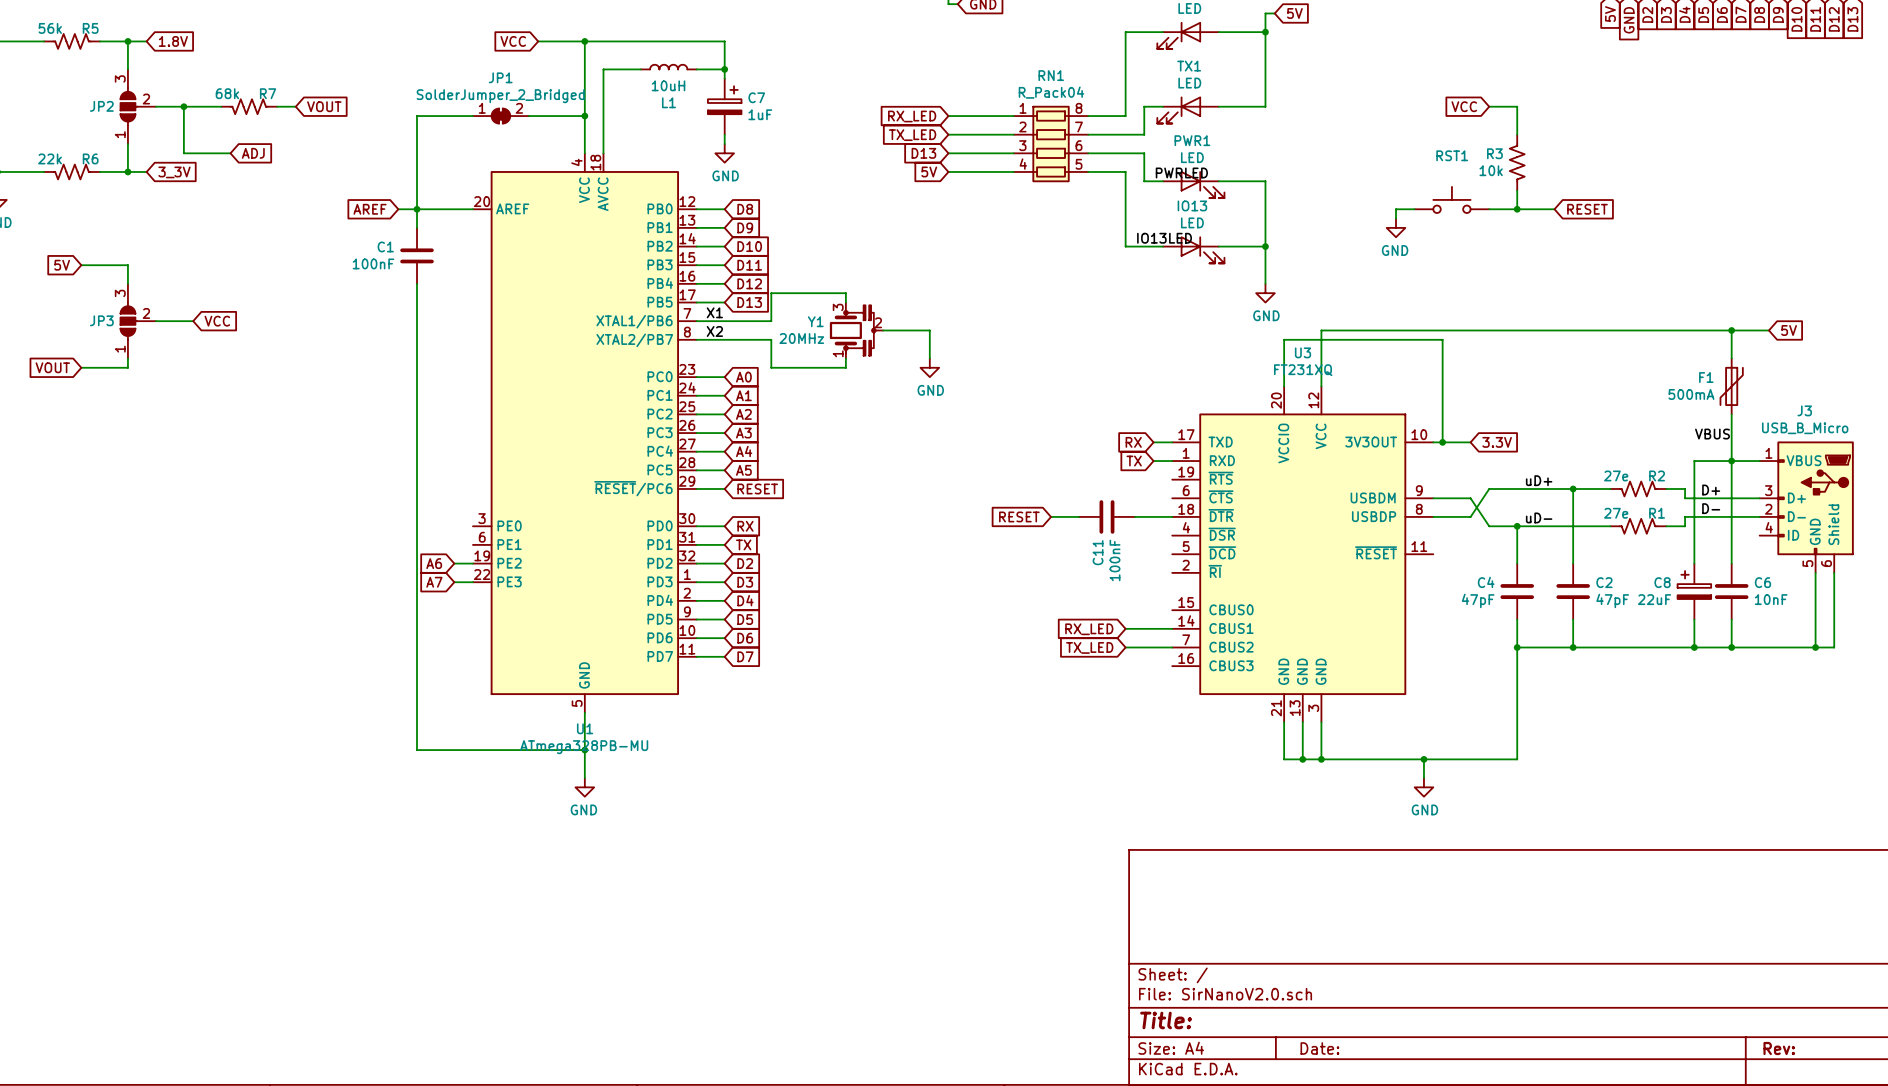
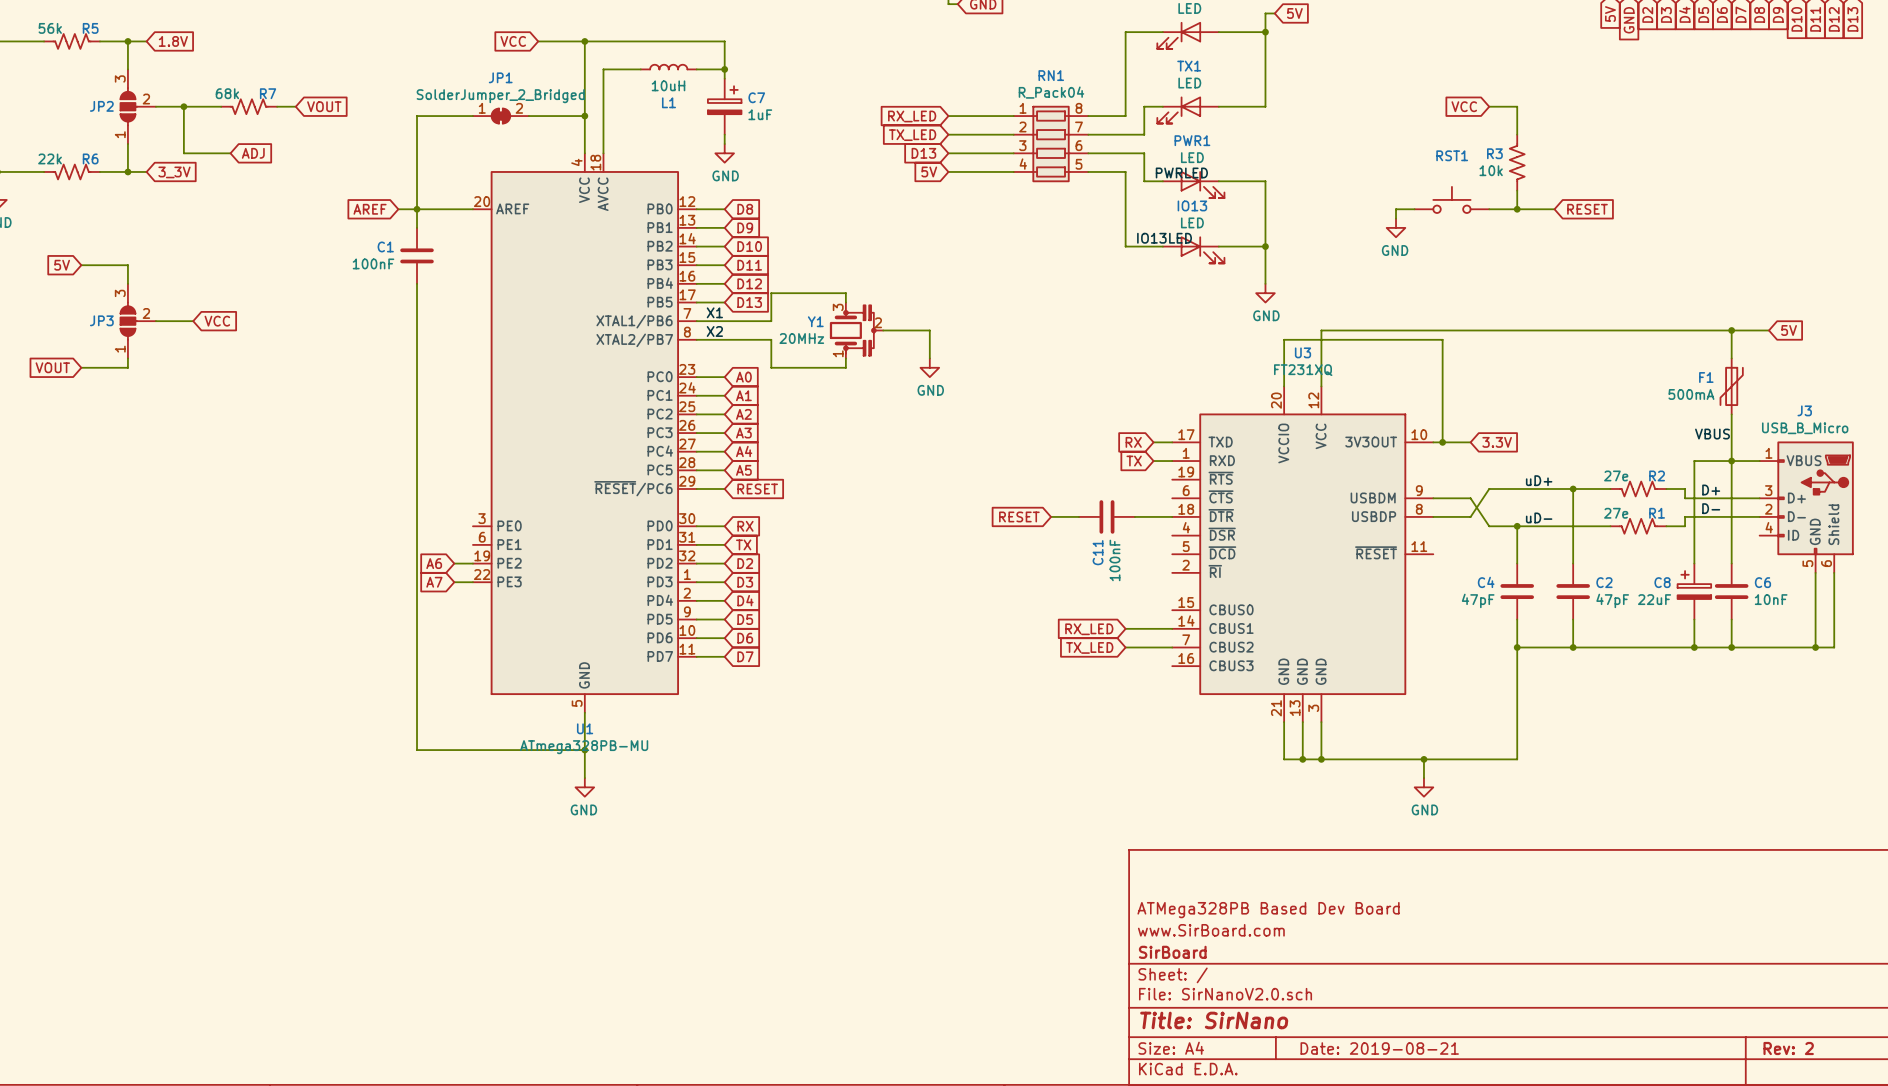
title block: none -> ATMega328PB Based Dev Board (1268, 910)
title block: none -> www.SirBoard.com (1211, 930)
title block: none -> SirBoard (1172, 952)
title block: Title: (1166, 1020) -> Title: SirNano (1214, 1020)
title block: Date: (1319, 1048) -> Date: 2019-08-21 (1379, 1048)
title block: Rev: (1779, 1048) -> Rev: 2 (1788, 1048)

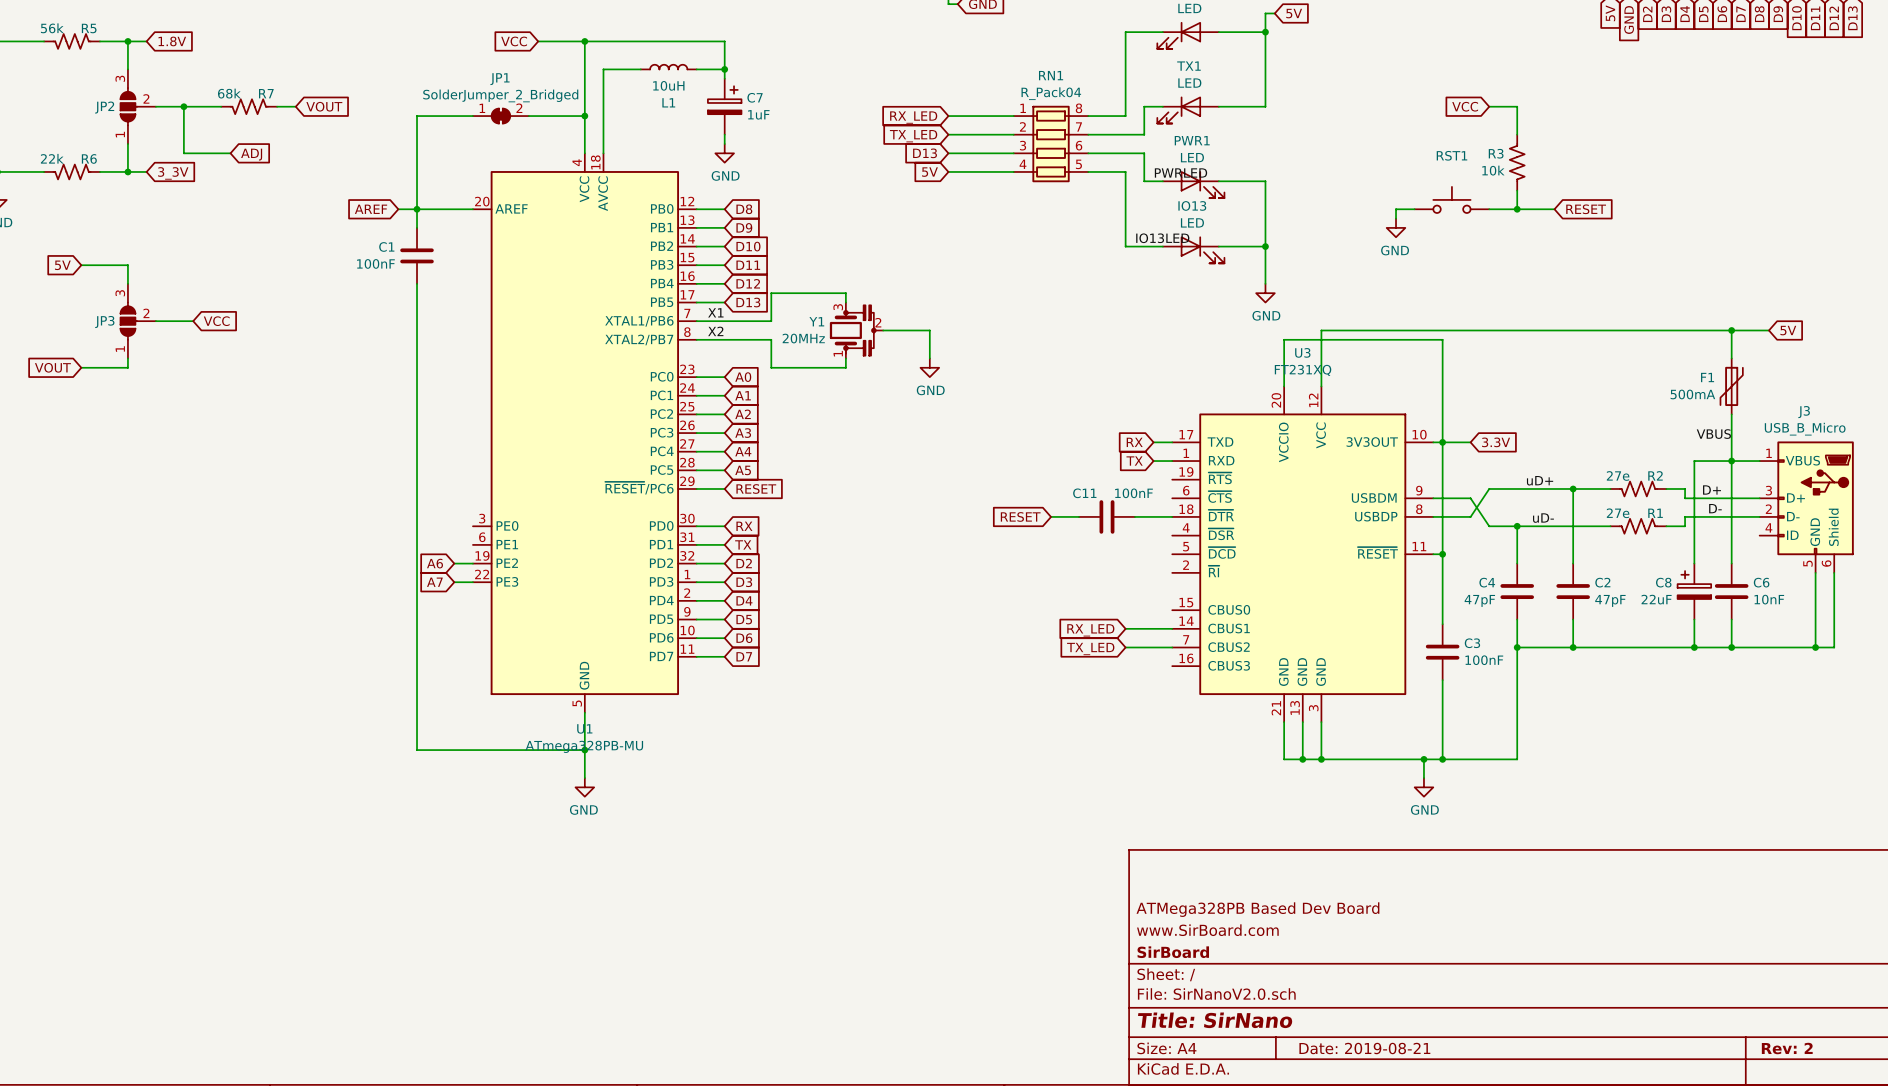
wire: none -> (1442, 442) (1442, 624)
C11 name rotation: 0° (1098, 552) -> 90° clockwise (1084, 493)
C11 name position: C11 (1098, 552) -> C11 (1084, 493)
wire: none -> (1433, 554) (1442, 554)
junction: none -> (1442, 554)
C11 value rotation: 0° (1115, 560) -> 90° clockwise (1133, 493)
C11 value position: 100nF (1115, 560) -> 100nF (1133, 493)
C3: none -> 100nF (1442, 652)
wire: none -> (1442, 680) (1442, 759)
junction: none -> (1442, 759)

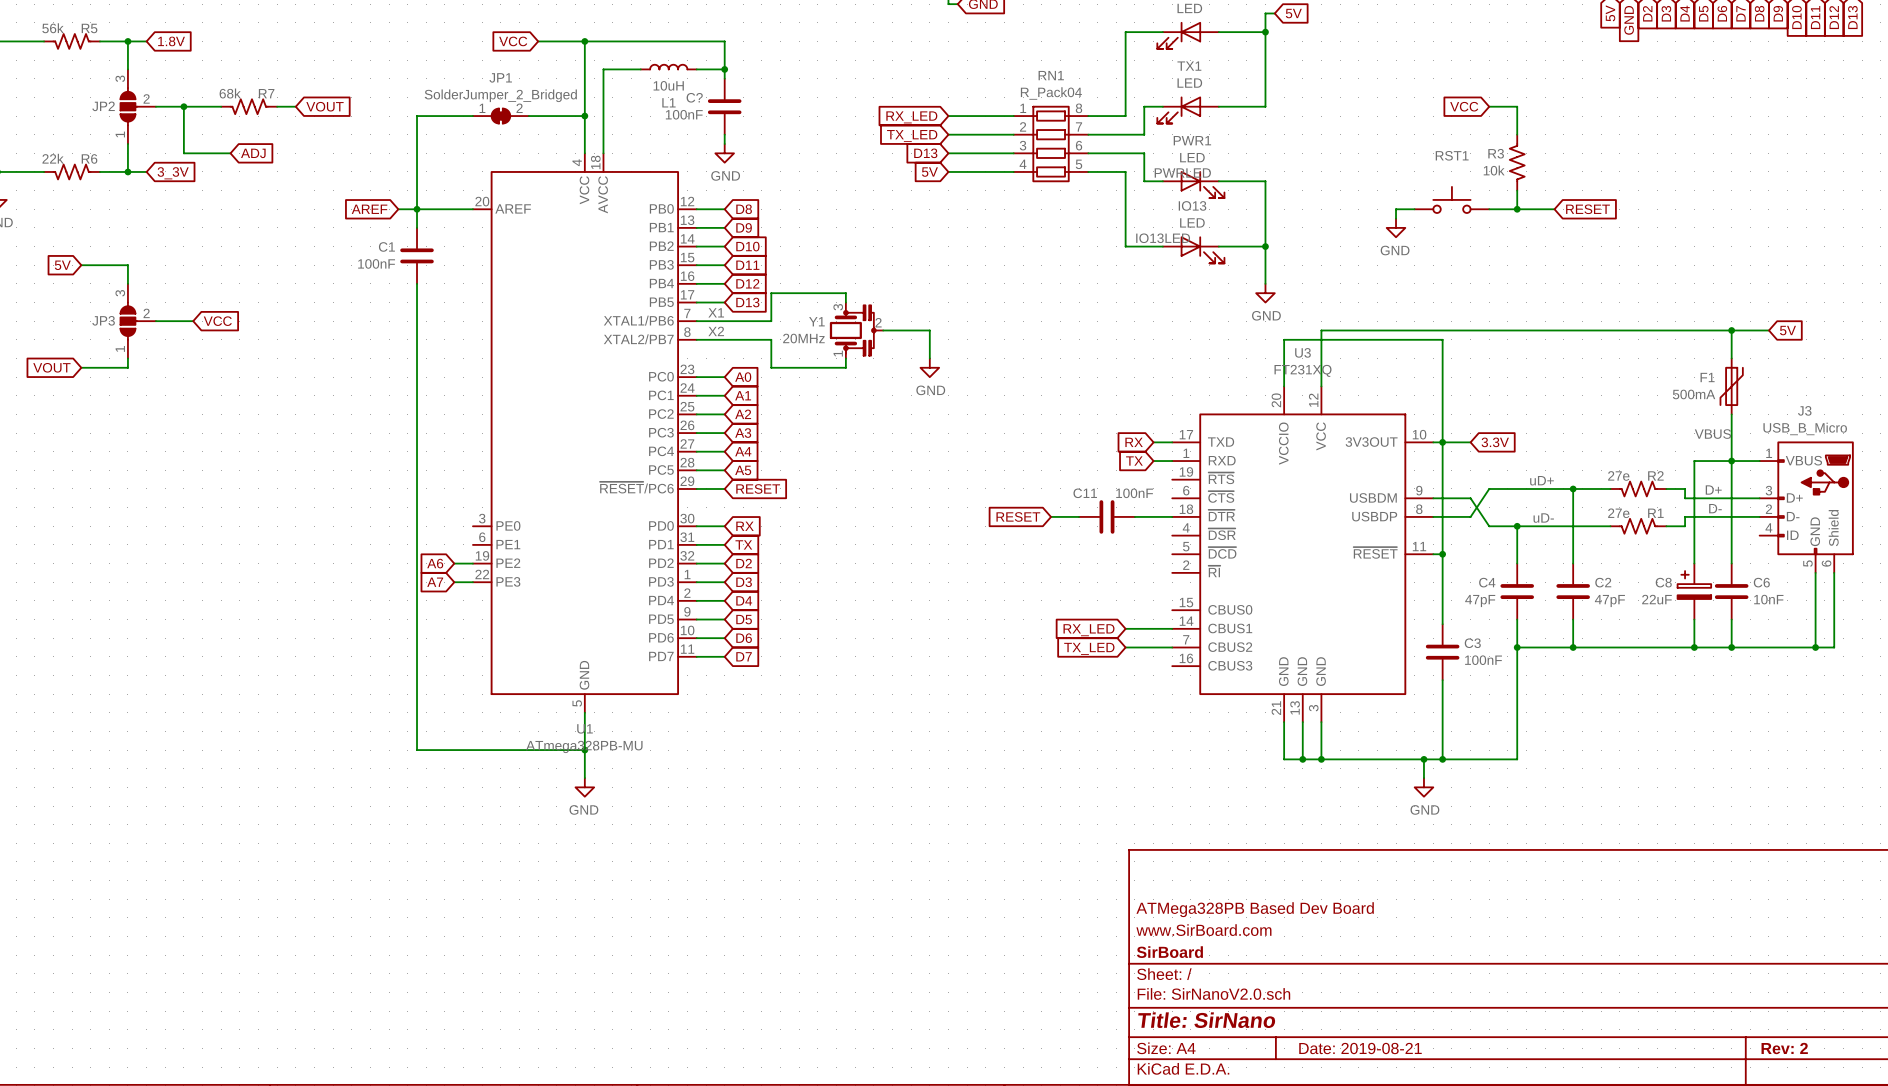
C7: 1uF (724, 106) -> none
C?: none -> 100nF (724, 106)

